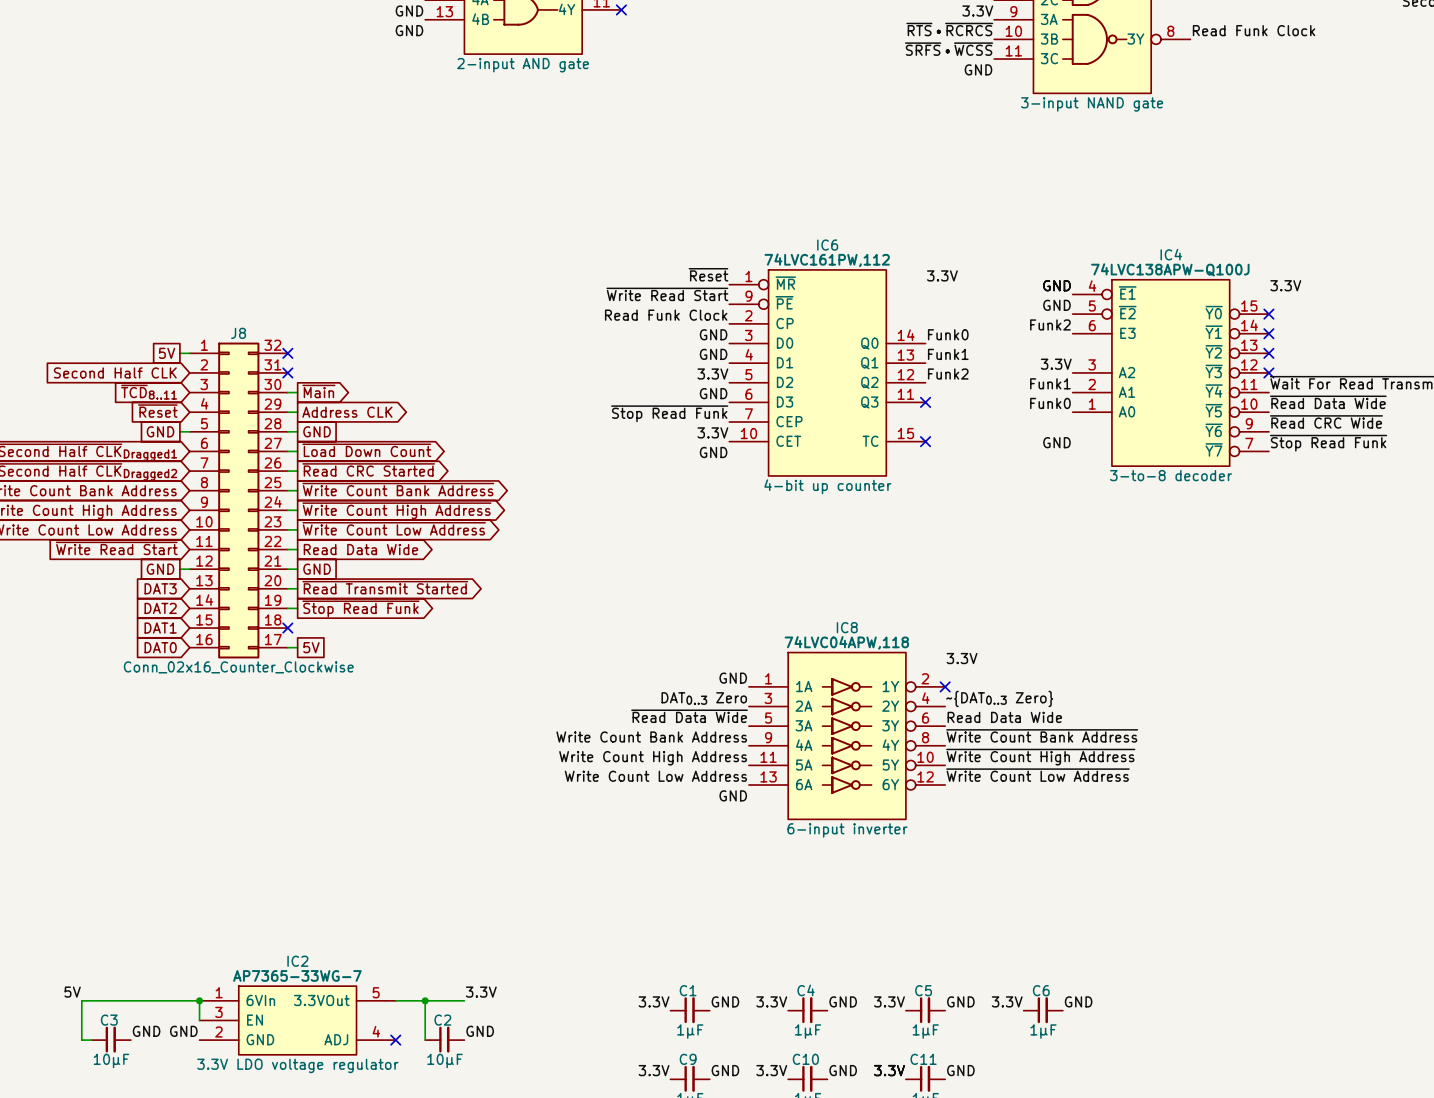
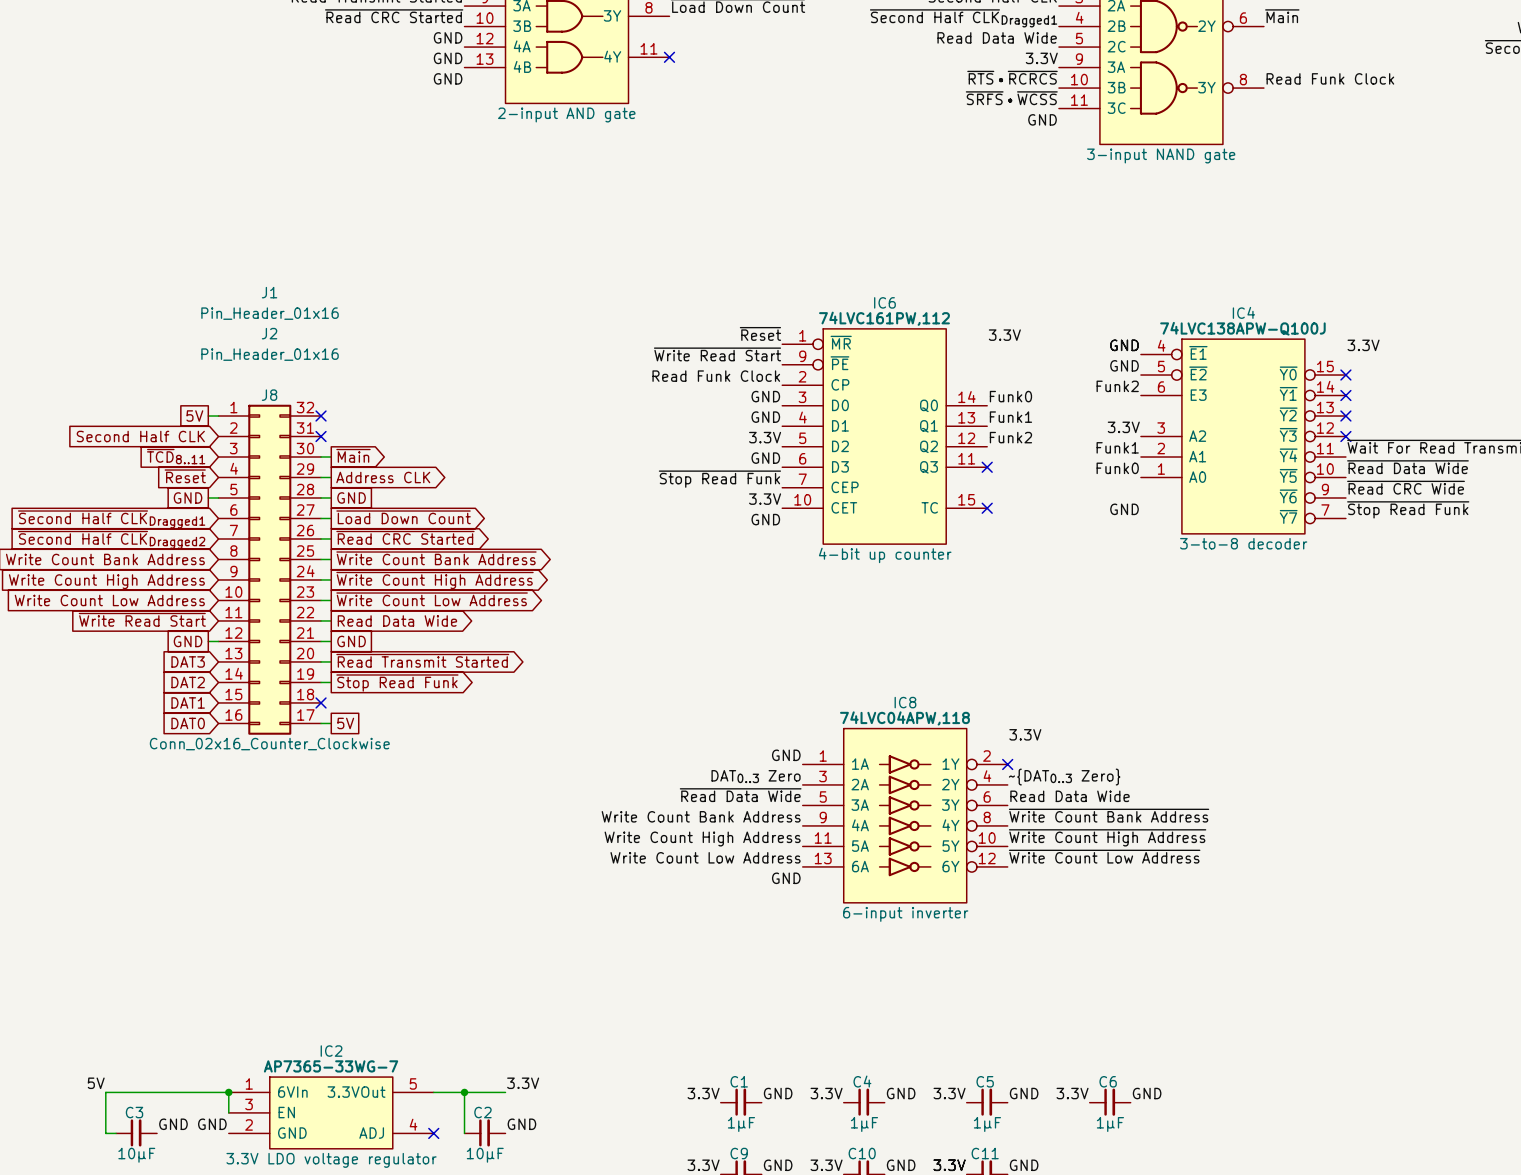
J1: none -> Pin_Header_01x16 (270, 303)
J2: none -> Pin_Header_01x16 (270, 344)

